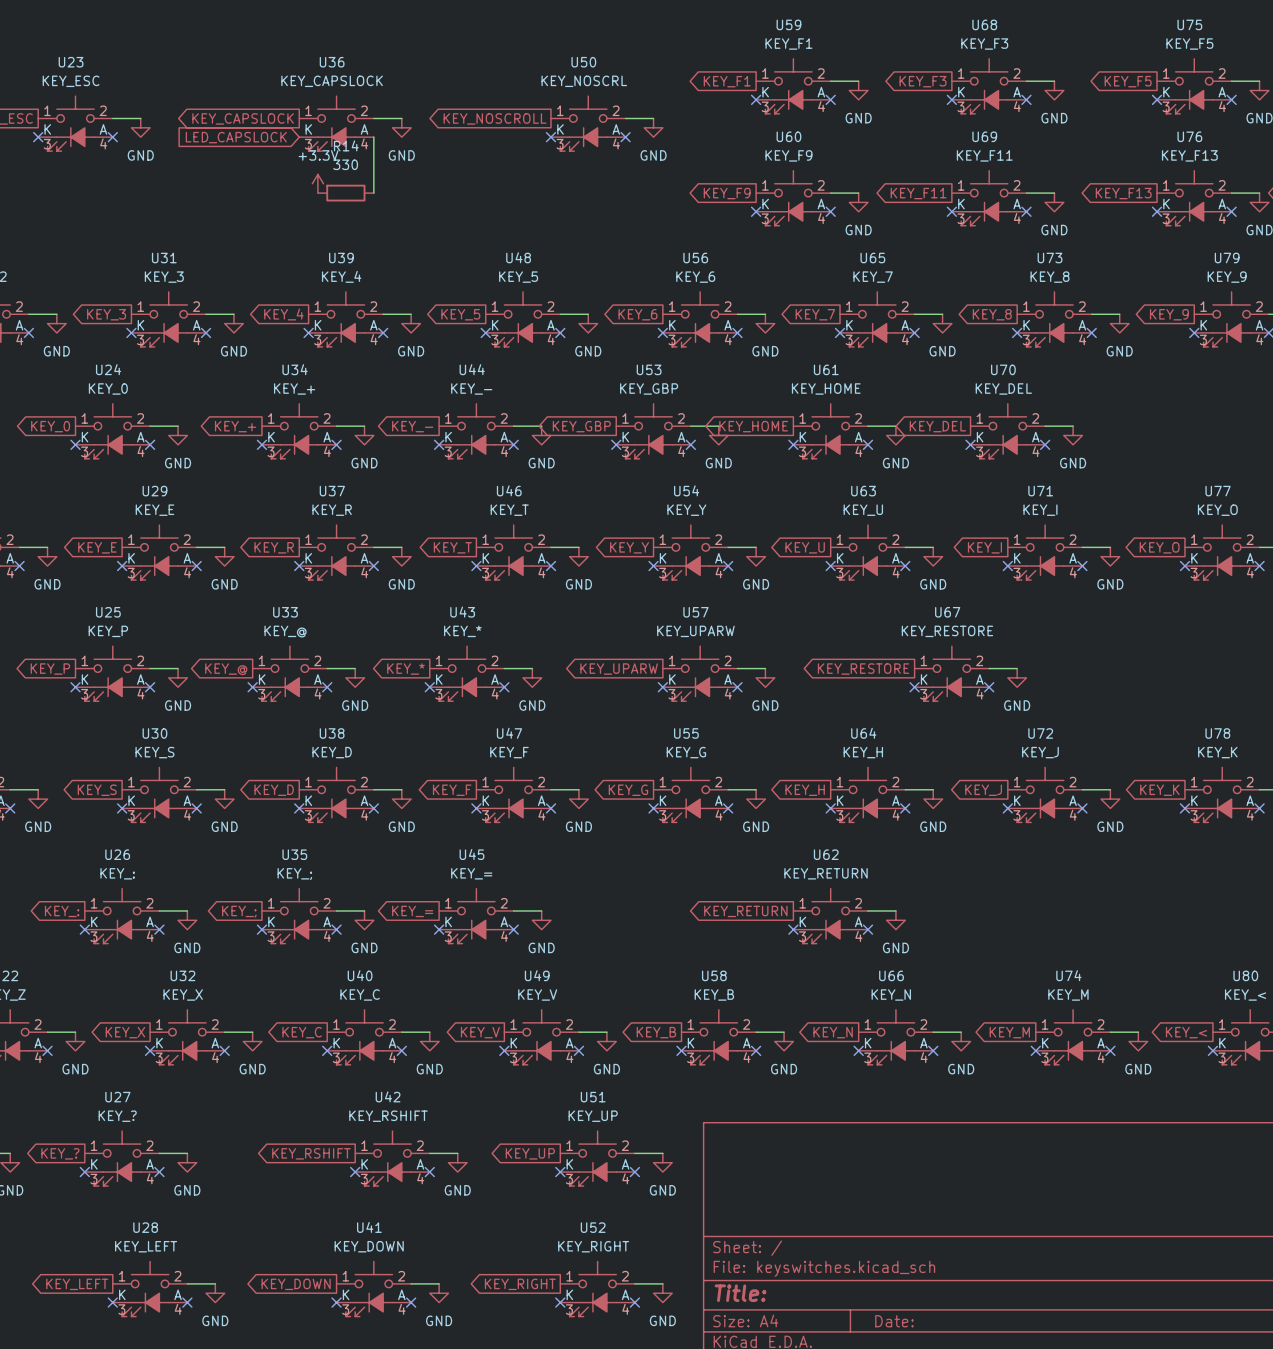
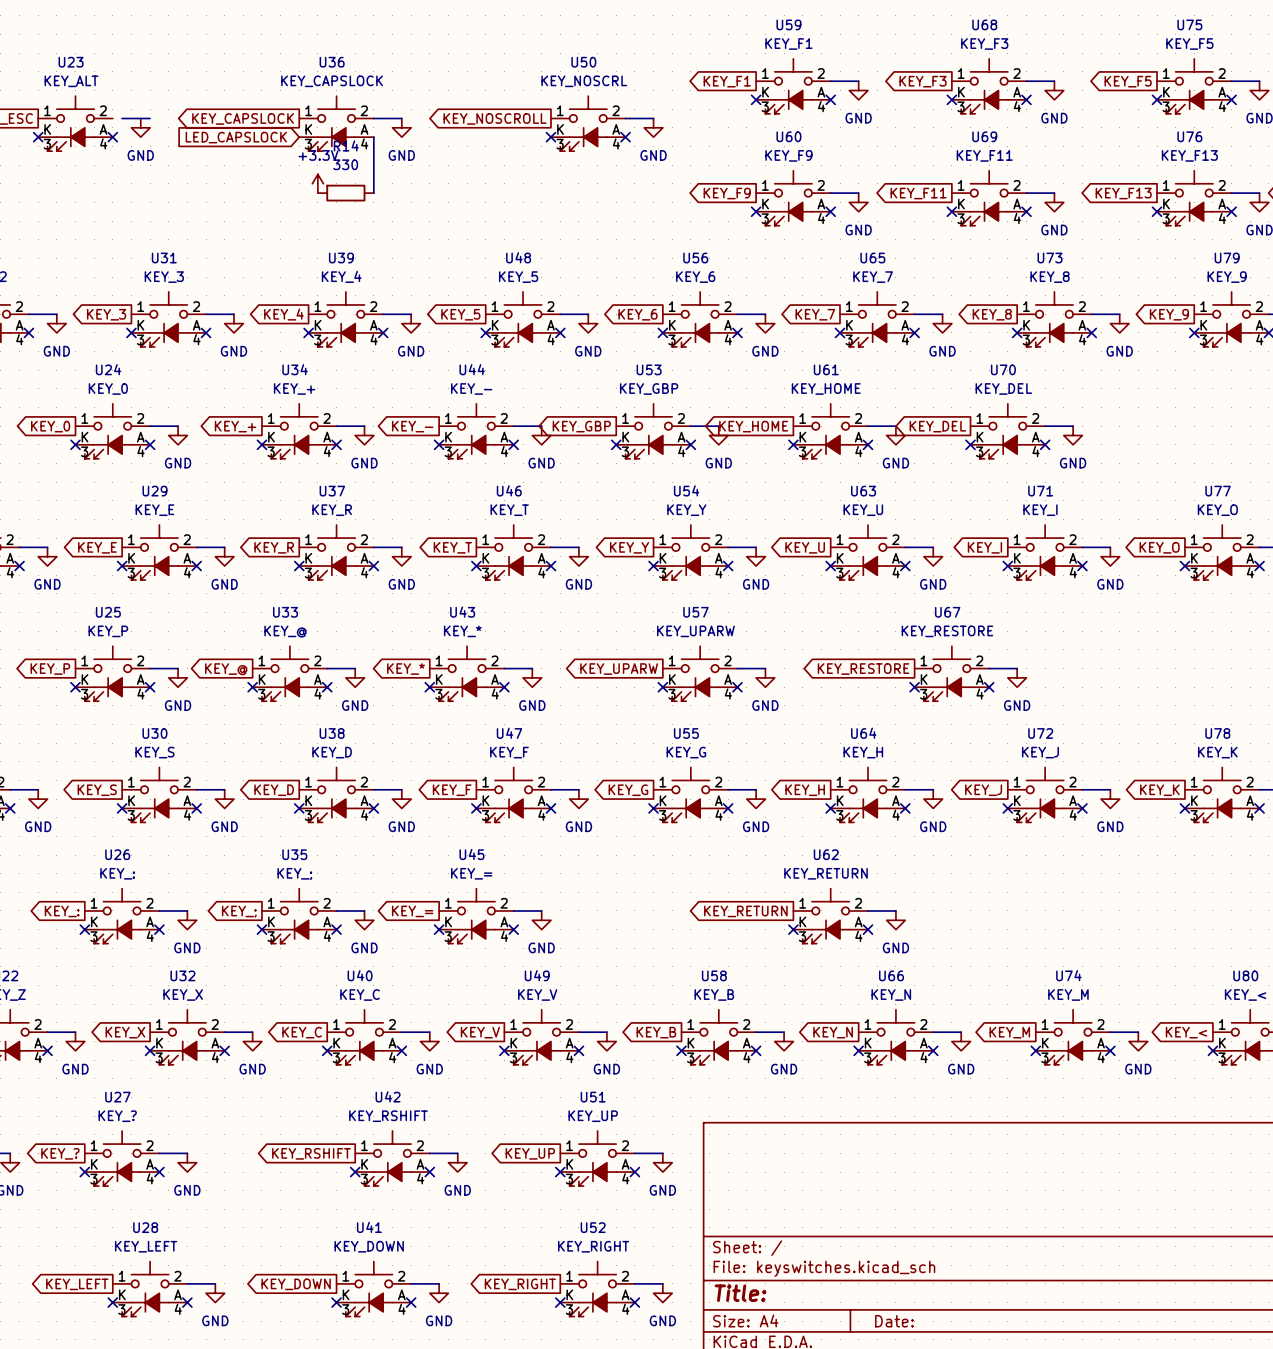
U23 value: KEY_ESC (71, 81) -> KEY_ALT (71, 81)
wire: (112, 118) (122, 118) -> (140, 118) (150, 118)

